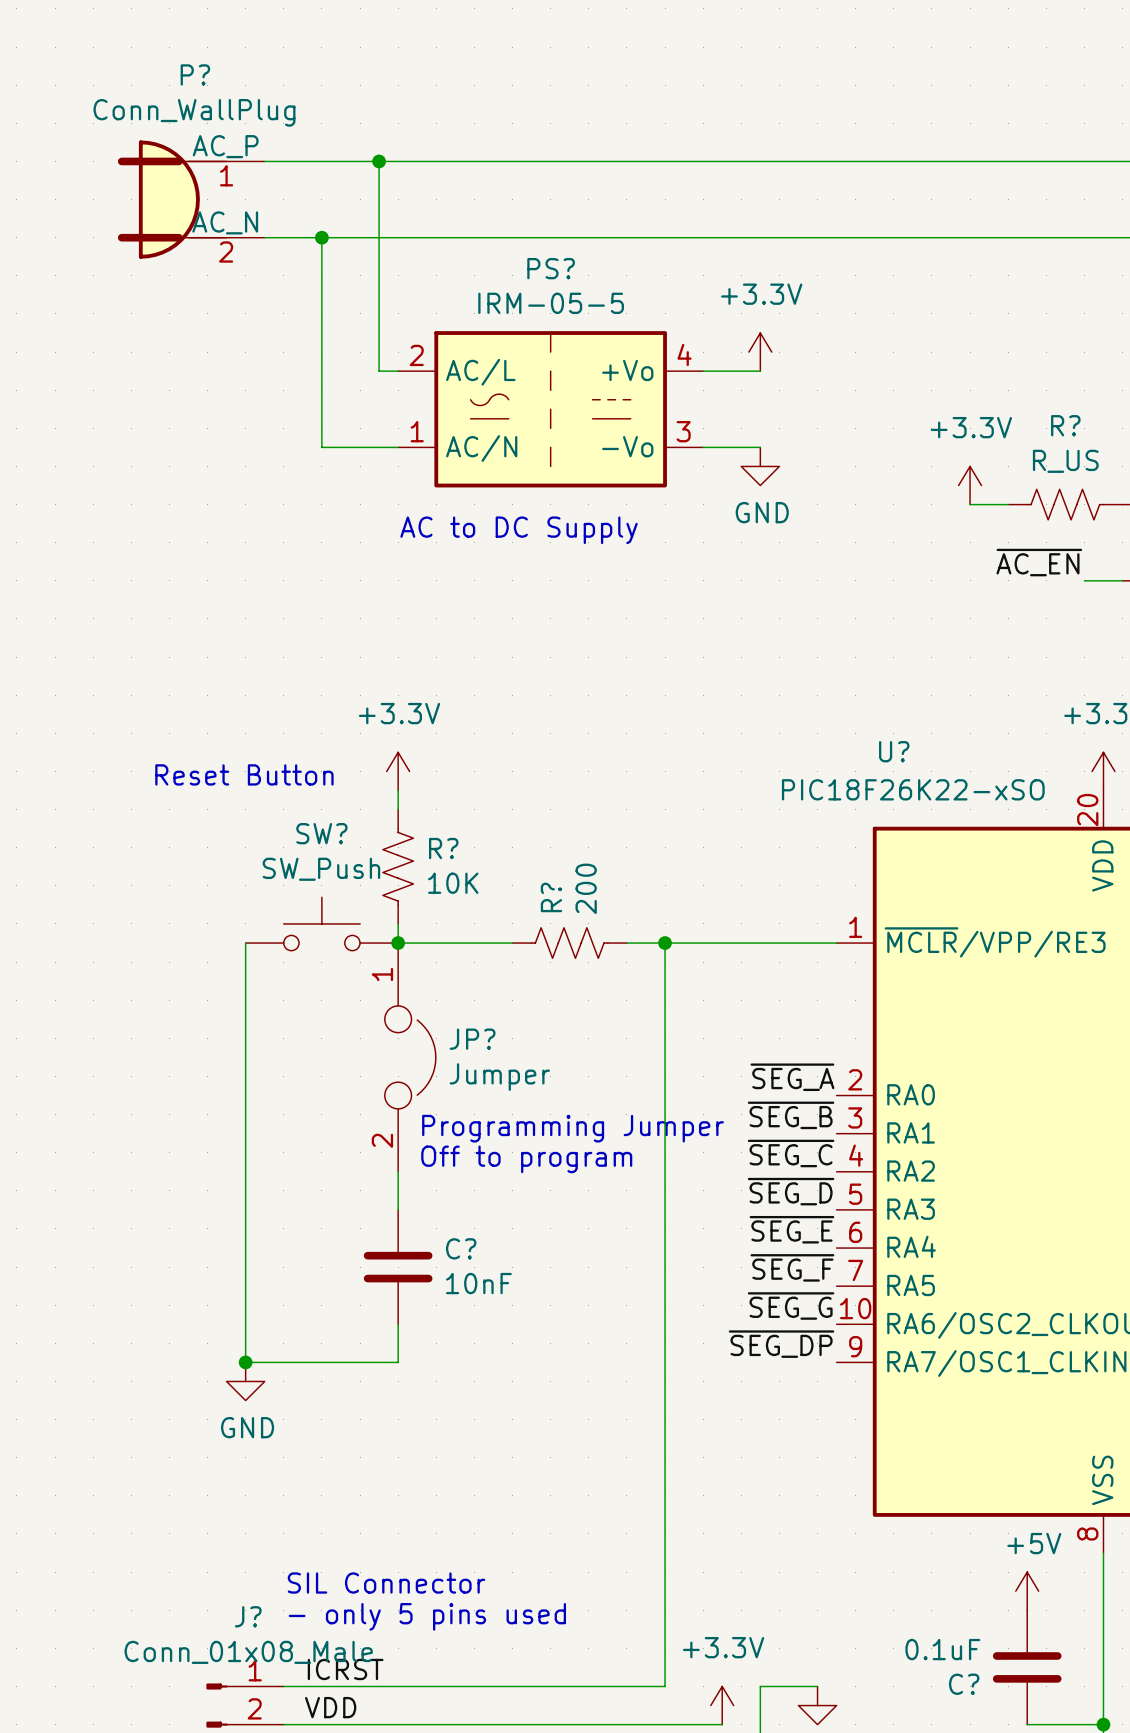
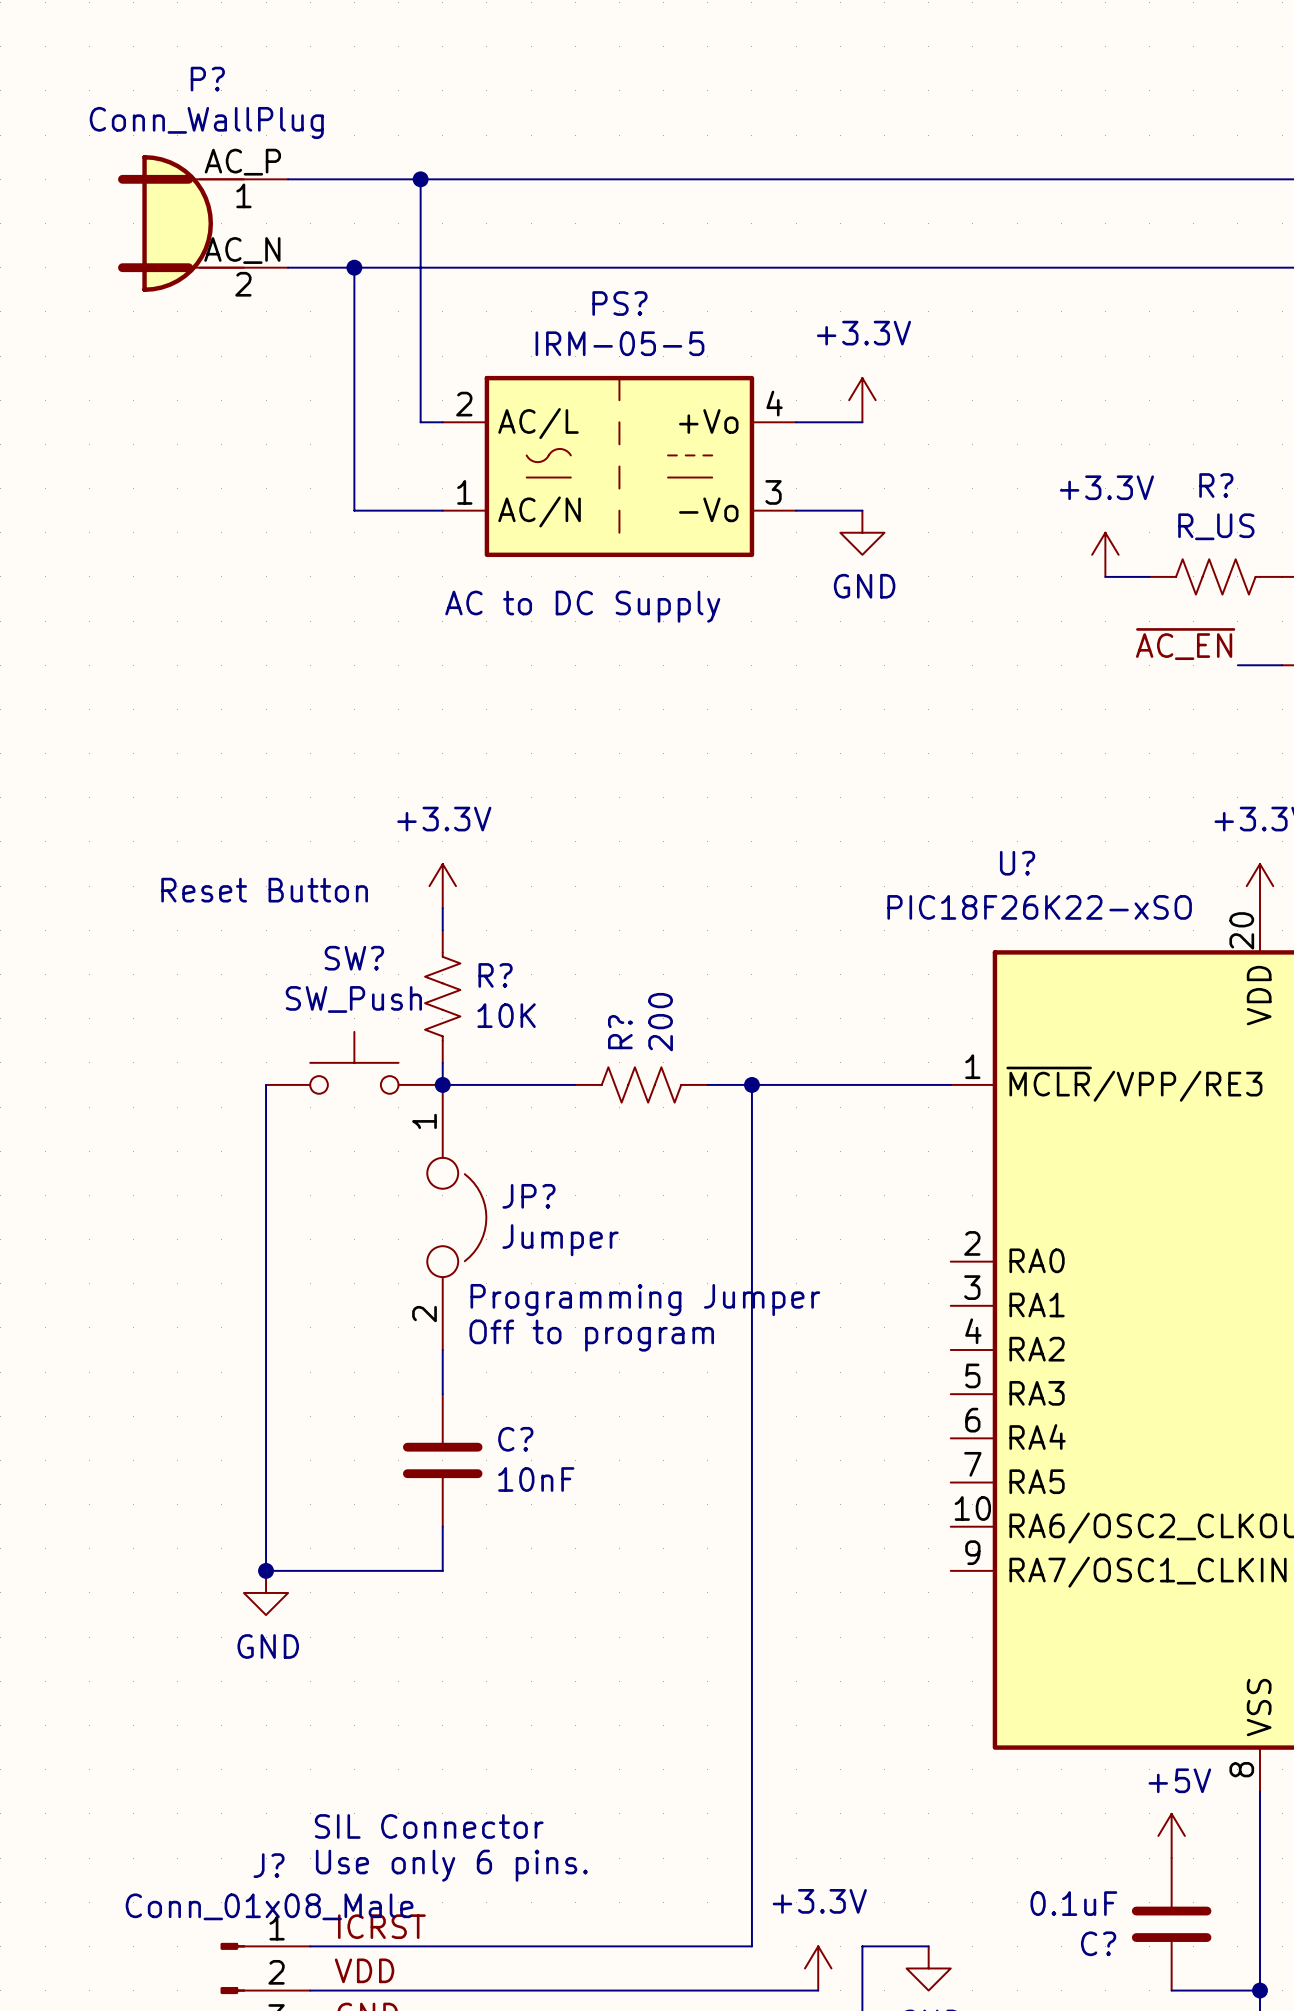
label: ~{SEG_A} (792, 1077) -> none
label: ~{SEG_B} (791, 1115) -> none
label: ~{SEG_C} (791, 1153) -> none
label: ~{SEG_D} (791, 1191) -> none
label: ~{SEG_E} (791, 1229) -> none
label: ~{SEG_F} (792, 1267) -> none
label: ~{SEG_G} (791, 1306) -> none
label: ~{SEG_DP} (781, 1344) -> none
text: - only 5 pins used (427, 1616) -> Use only 6 pins. (451, 1865)

